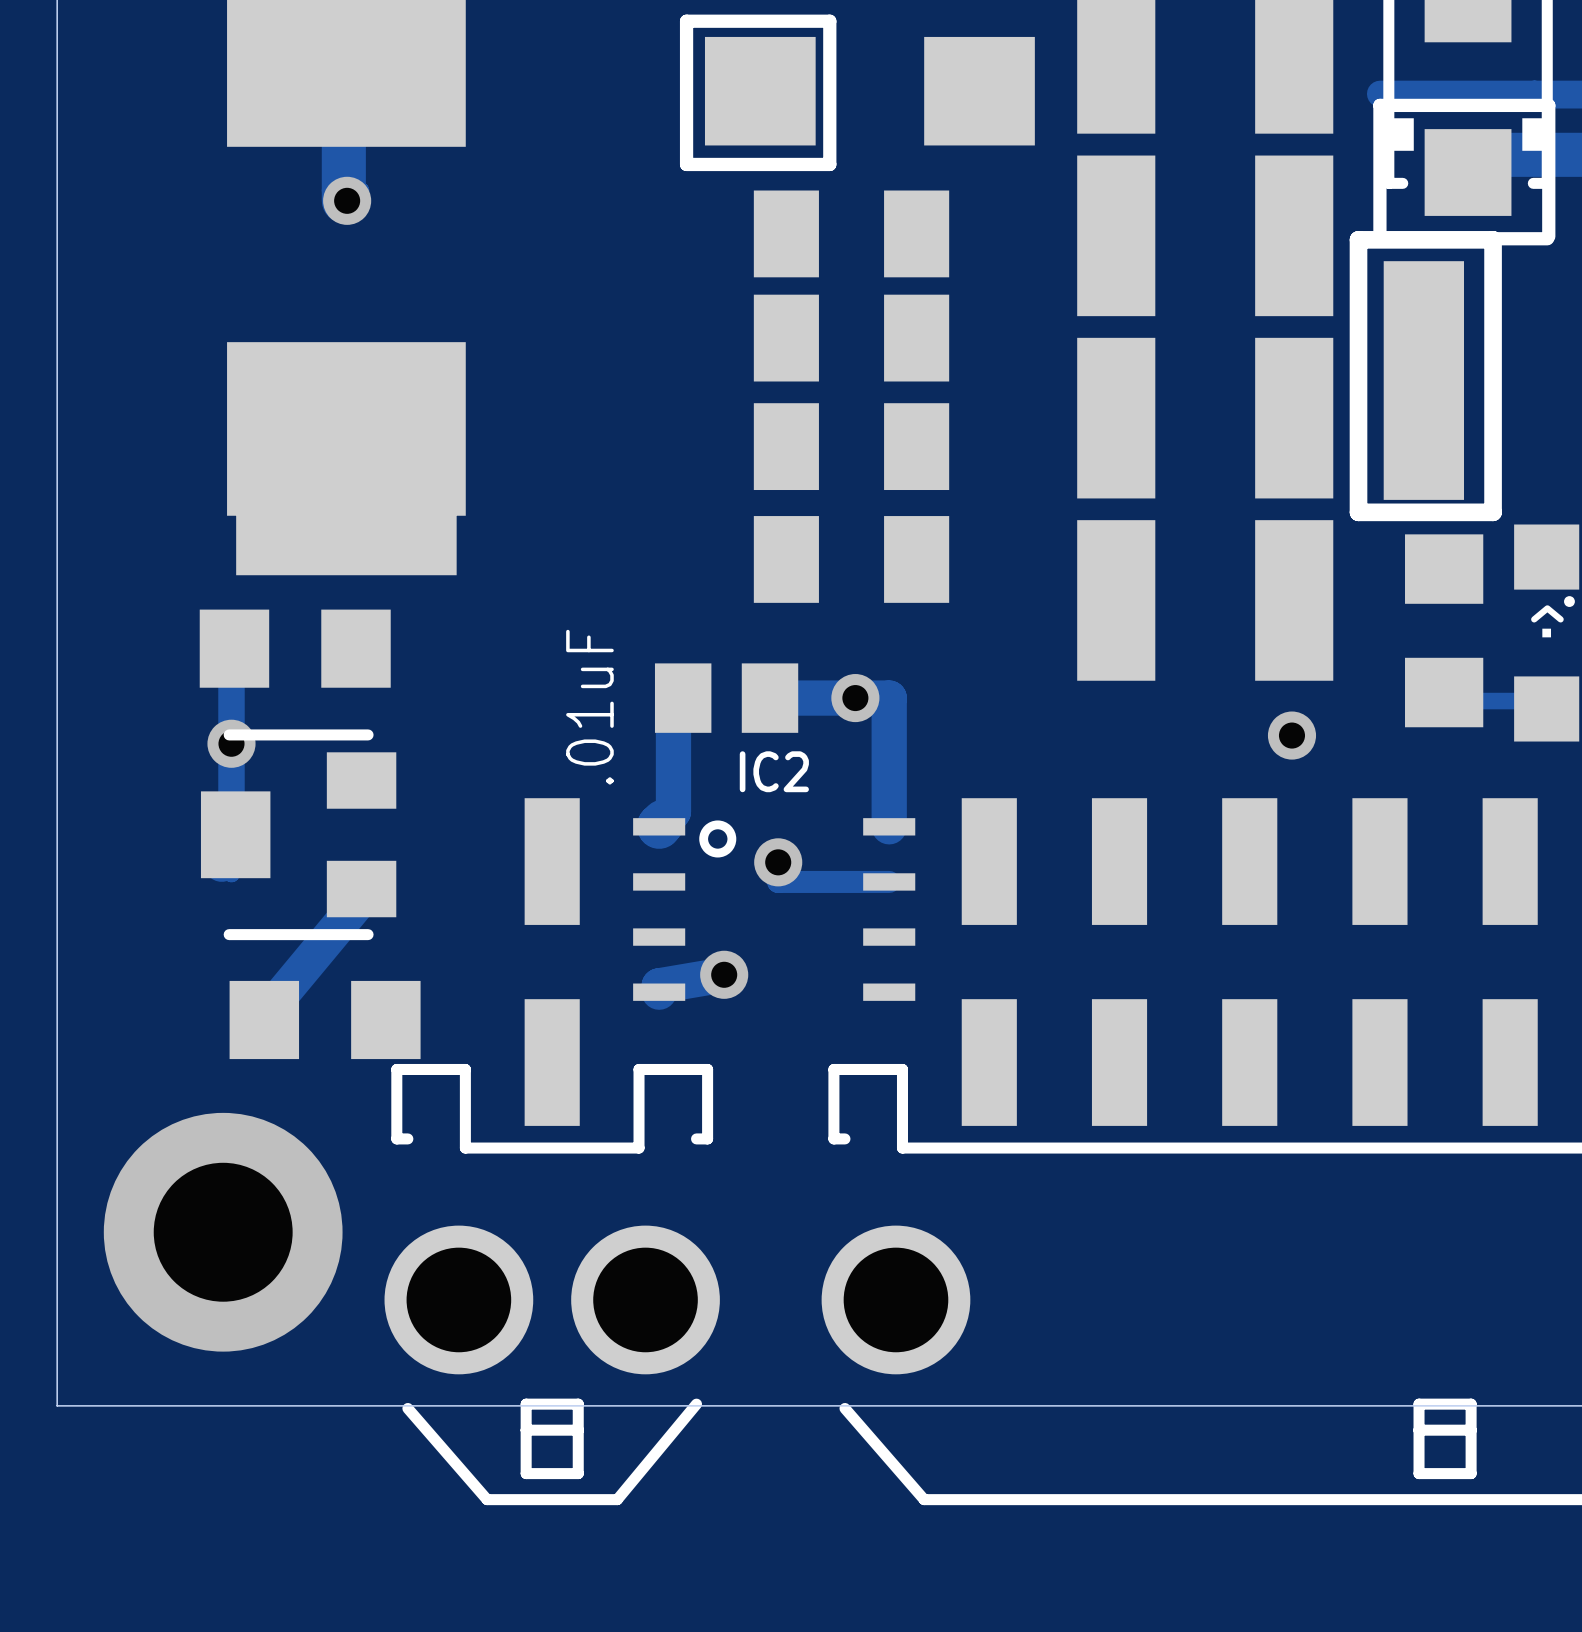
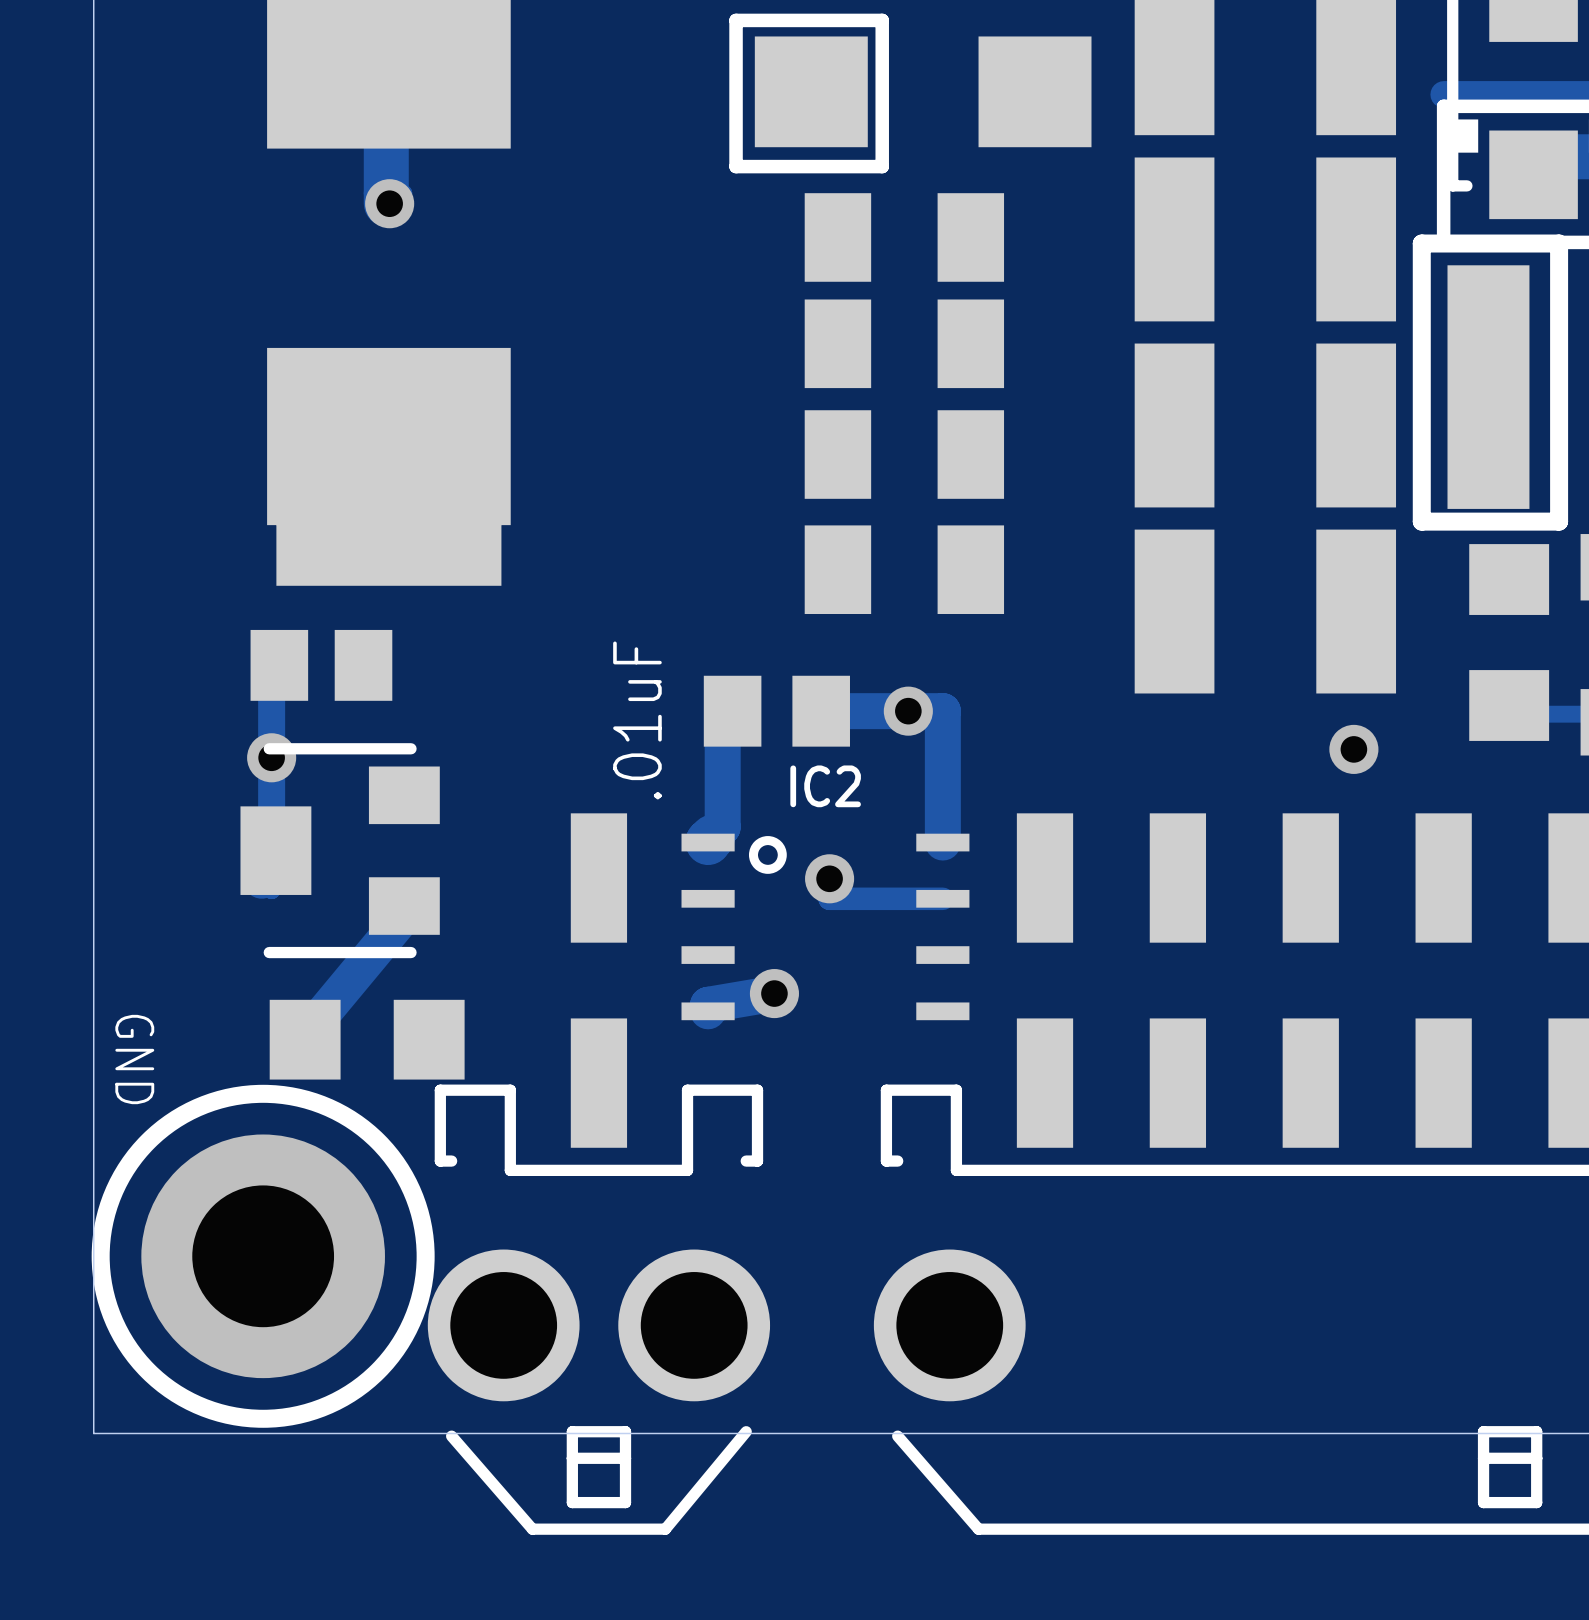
part footprint: [199, 609, 391, 688] -> [250, 629, 393, 701]
text: none -> GND (134, 1059)
drawing: none -> [91, 1084, 435, 1428]

